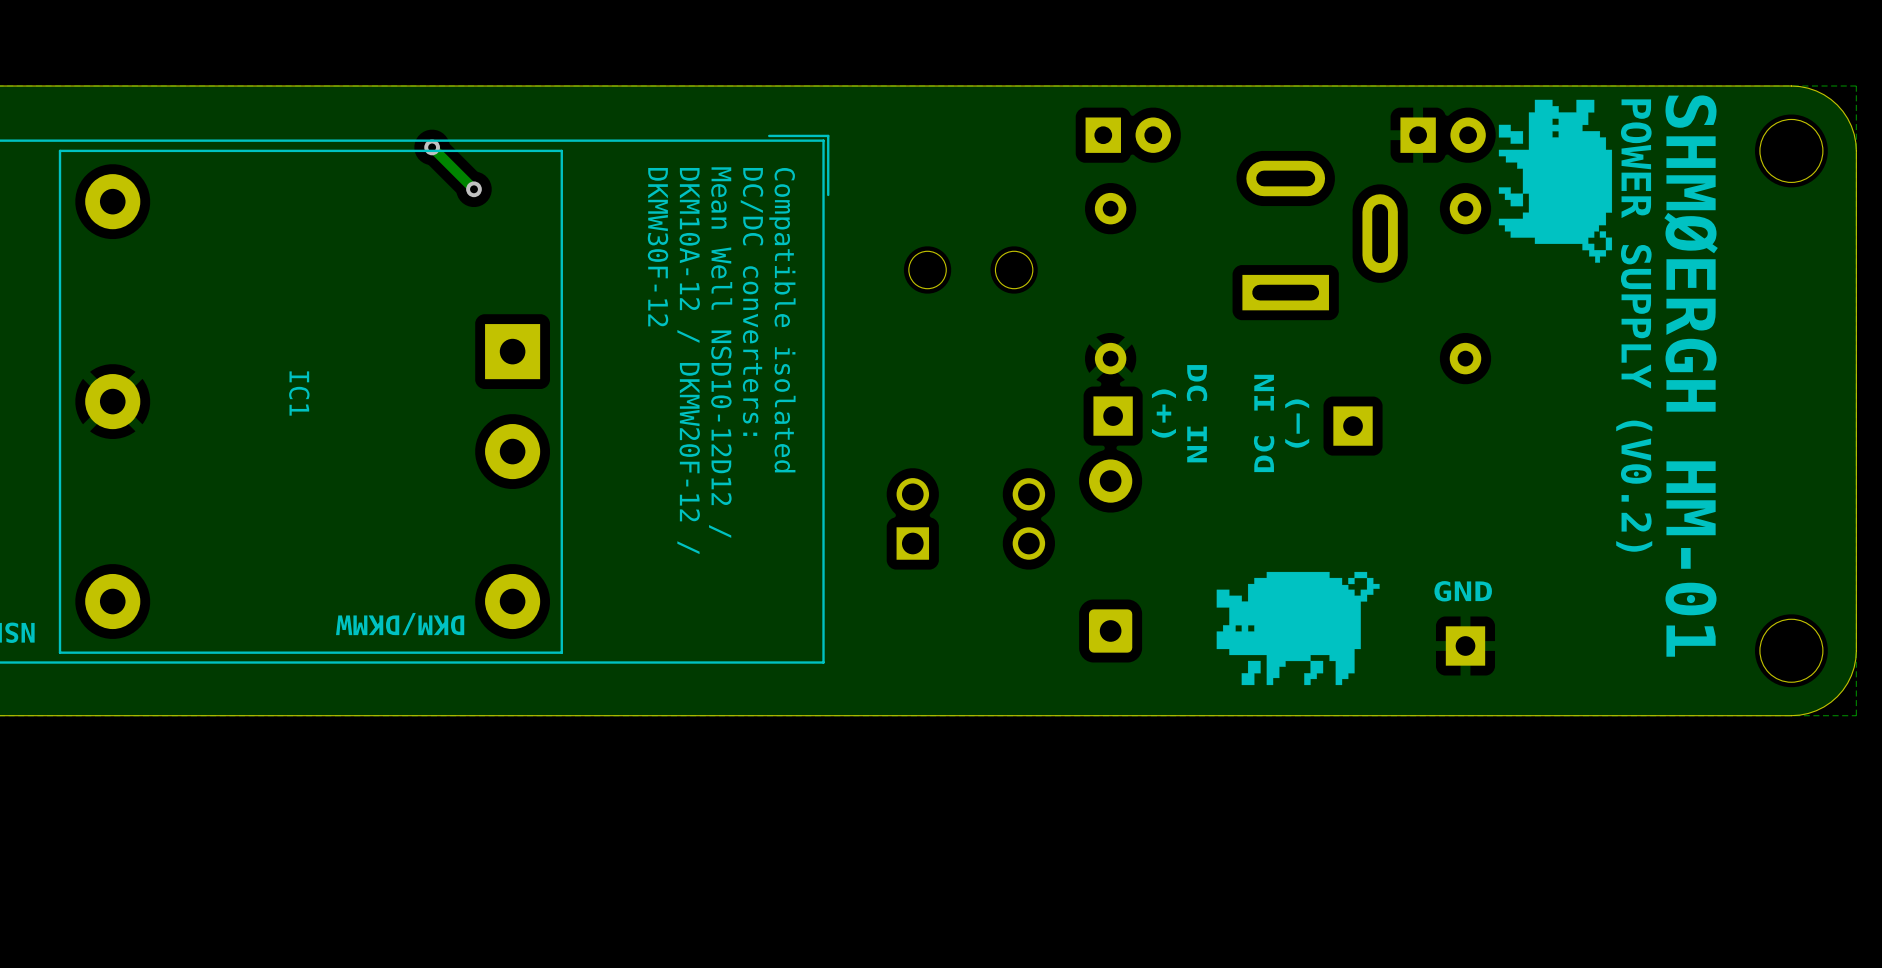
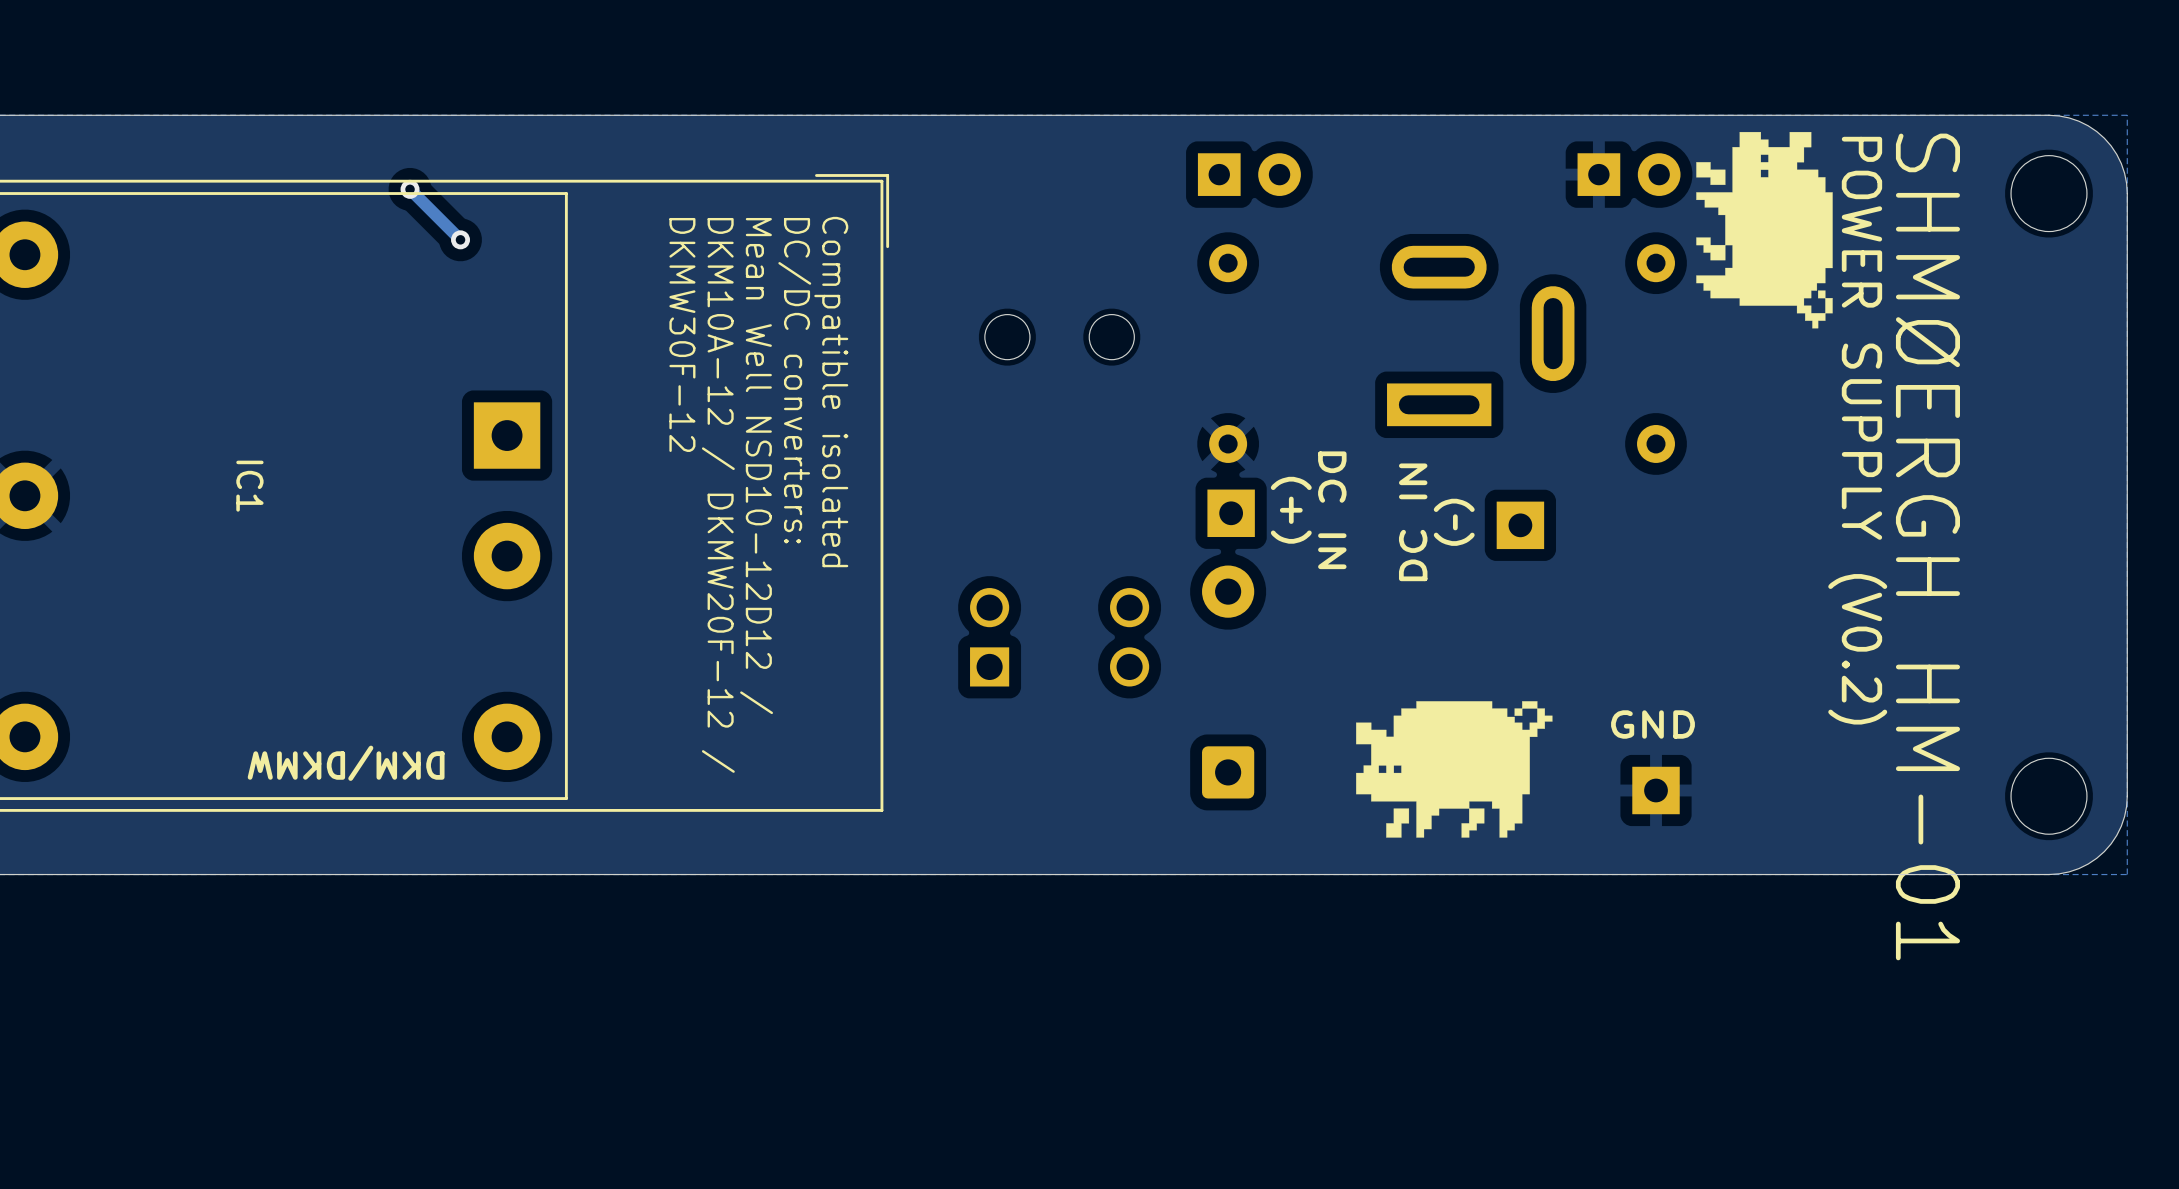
part position: (1320, 235) -> (1480, 335)

